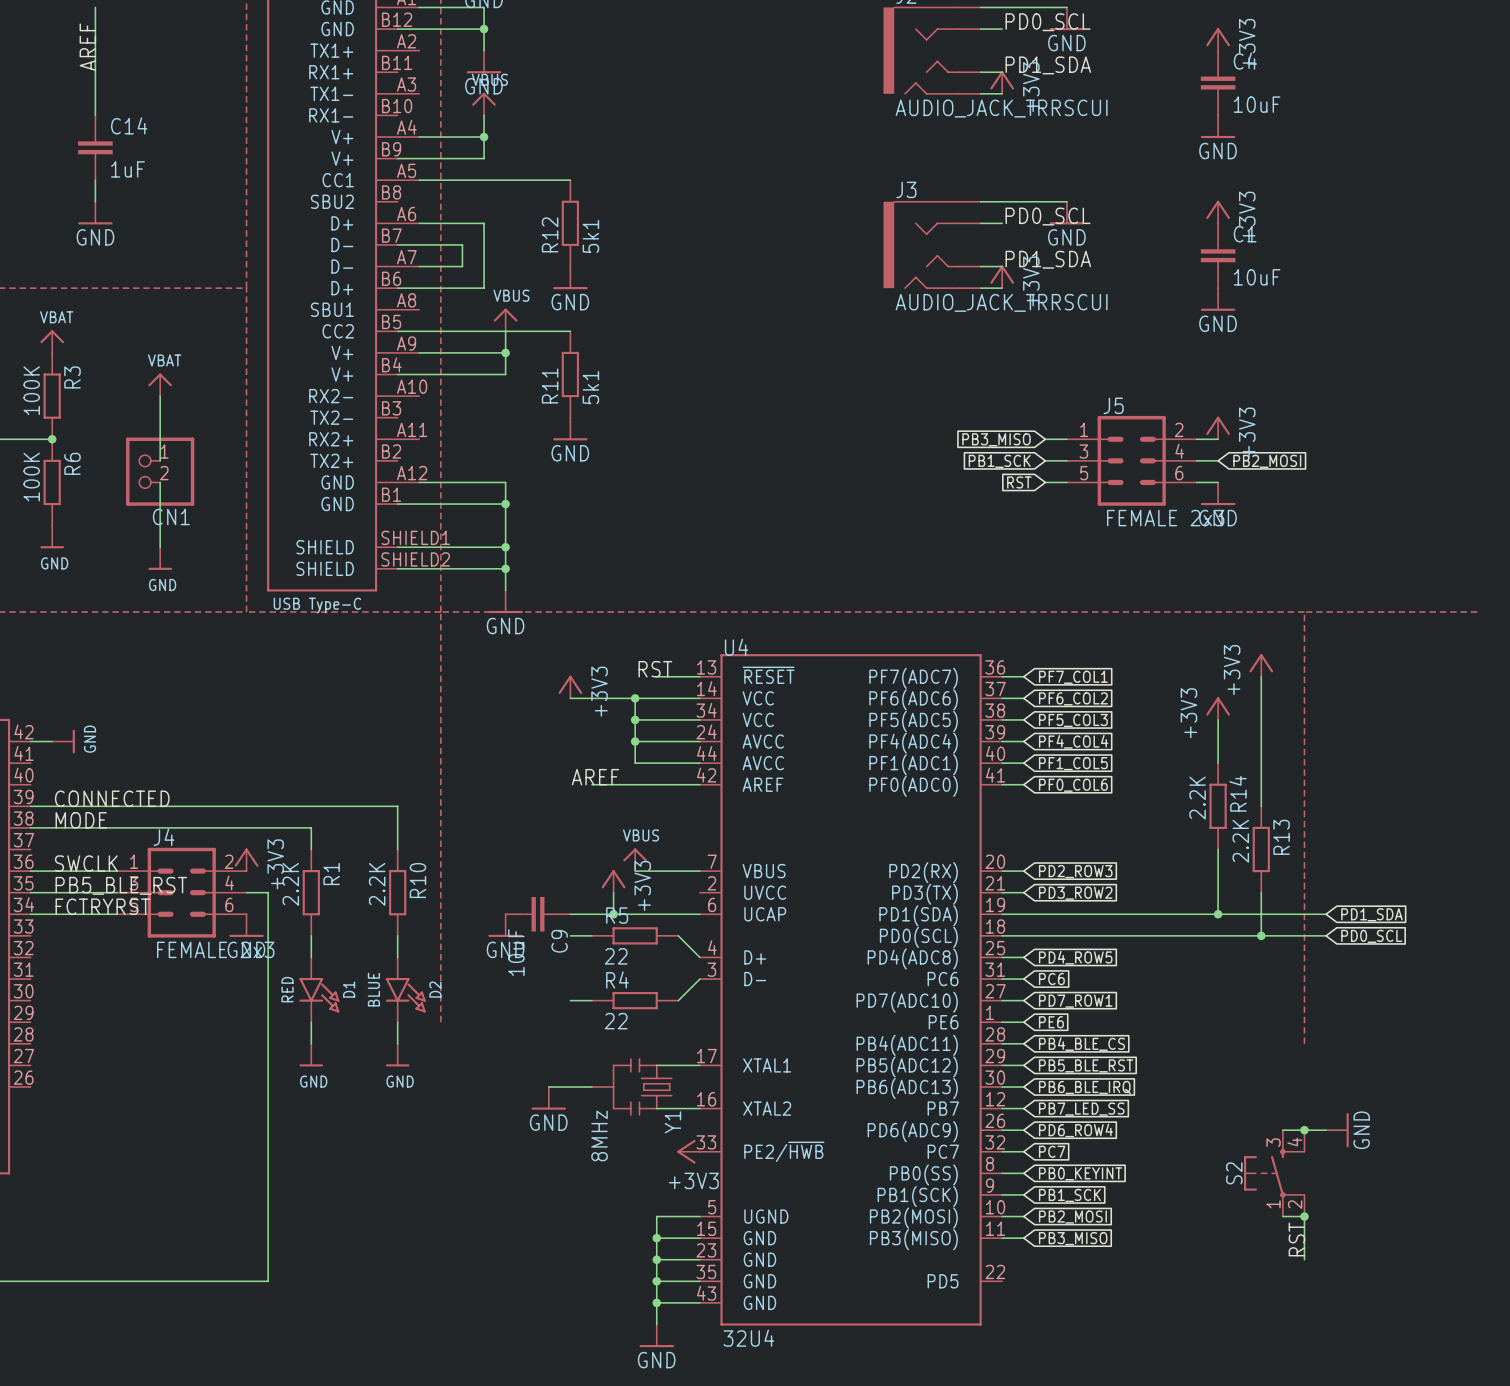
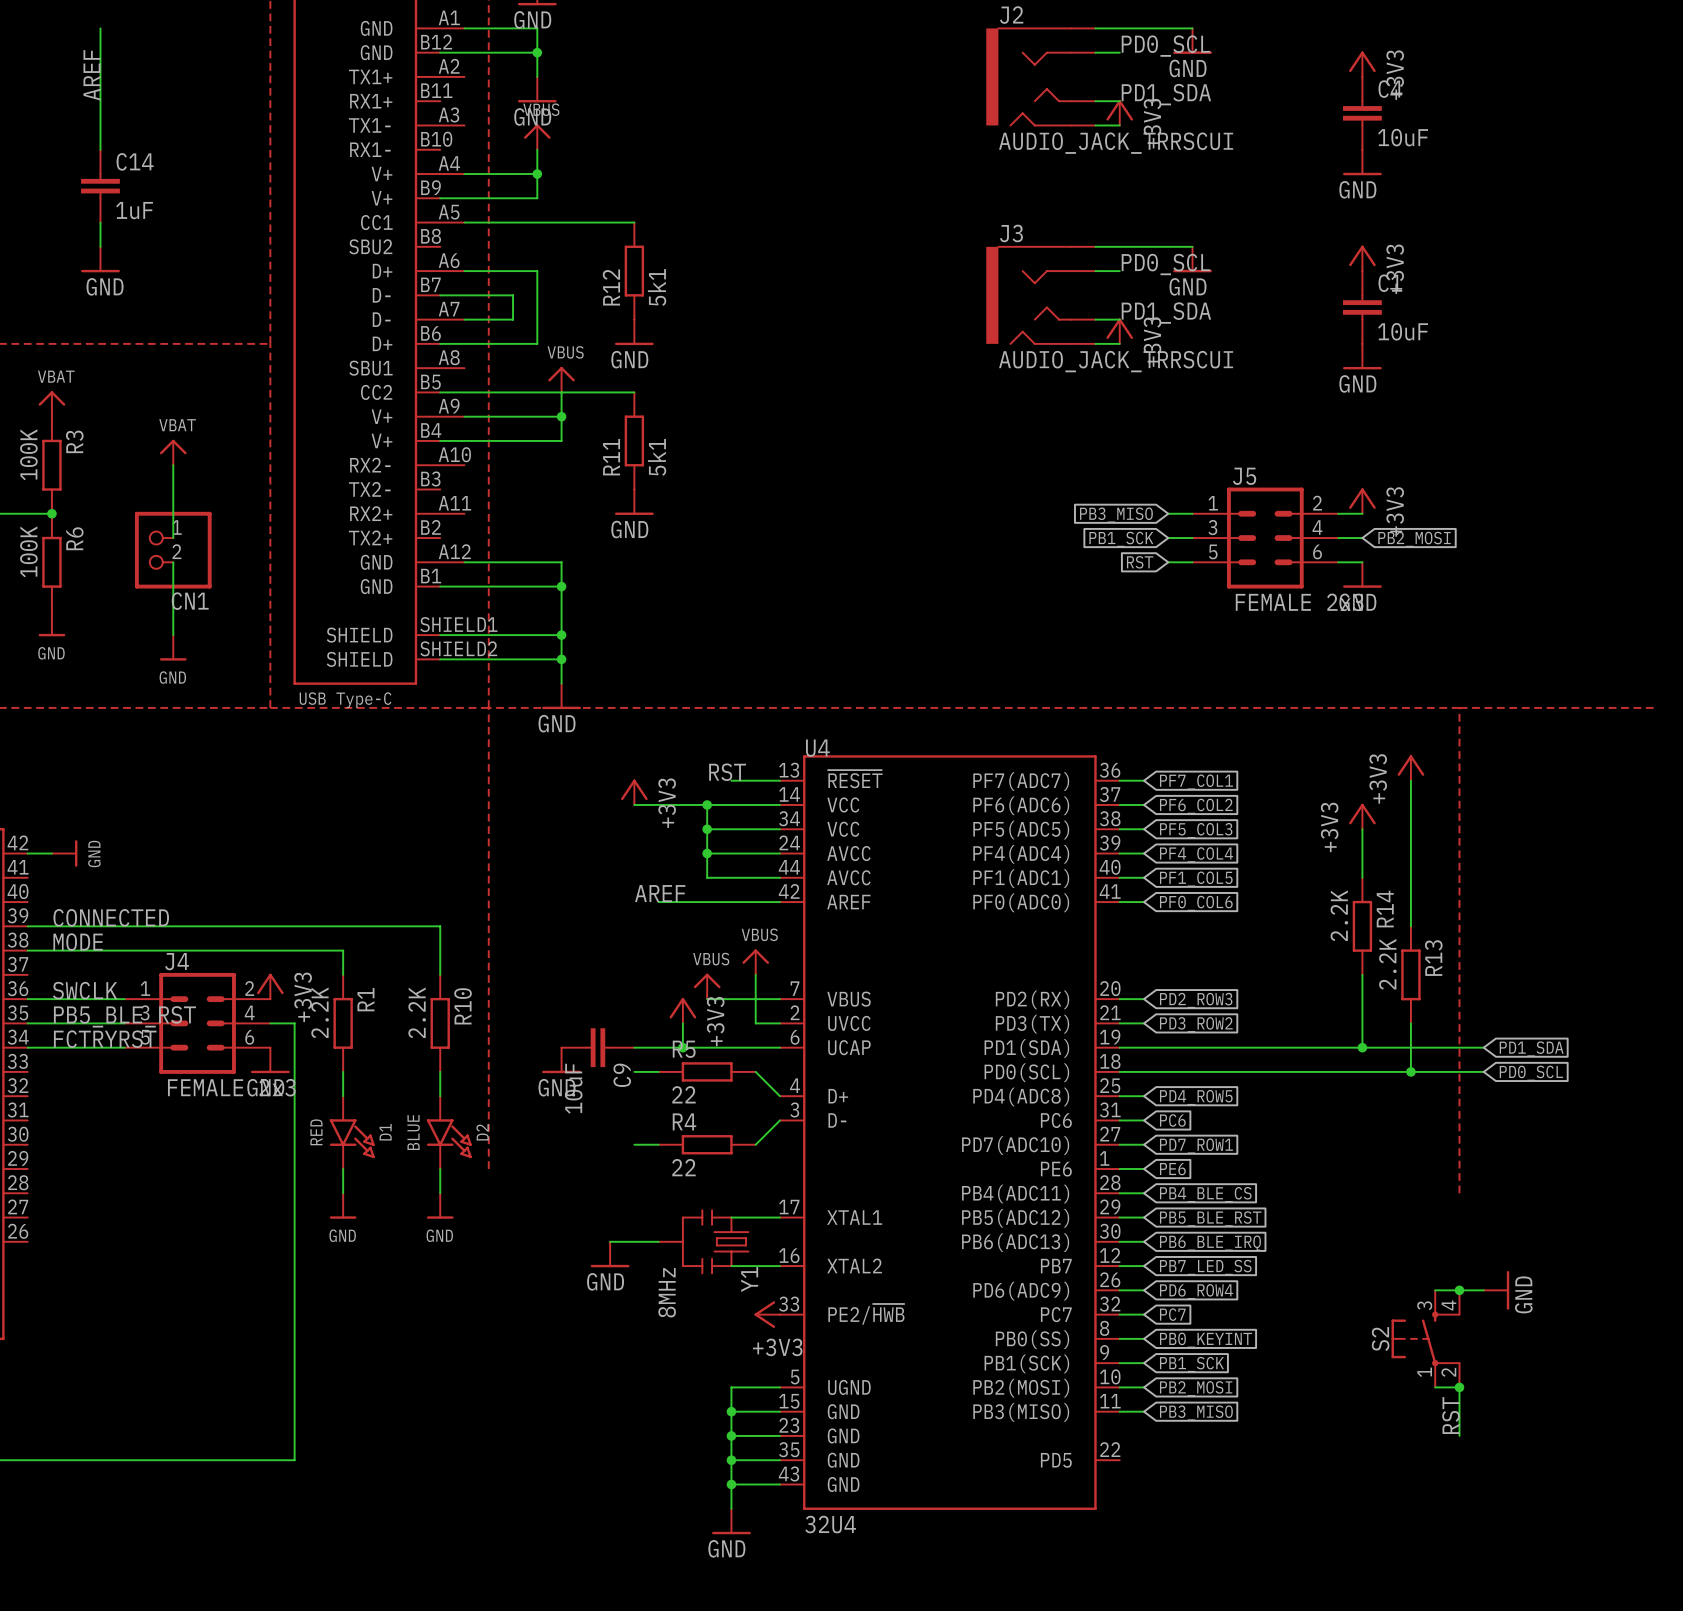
power symbol: none -> VBUS (755, 962)
wire: none -> (755, 974) (755, 1023) (779, 1023)

